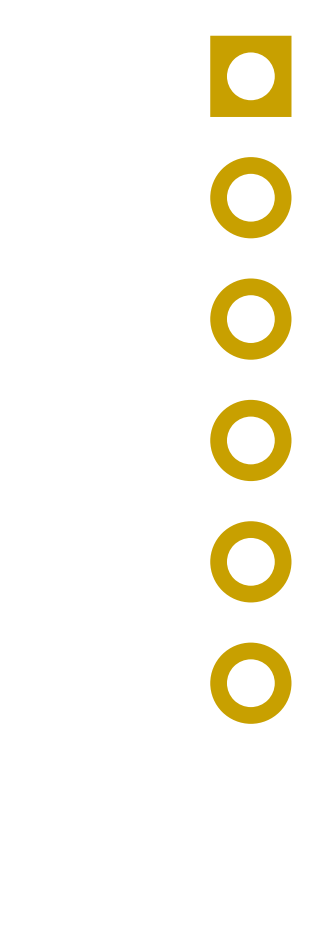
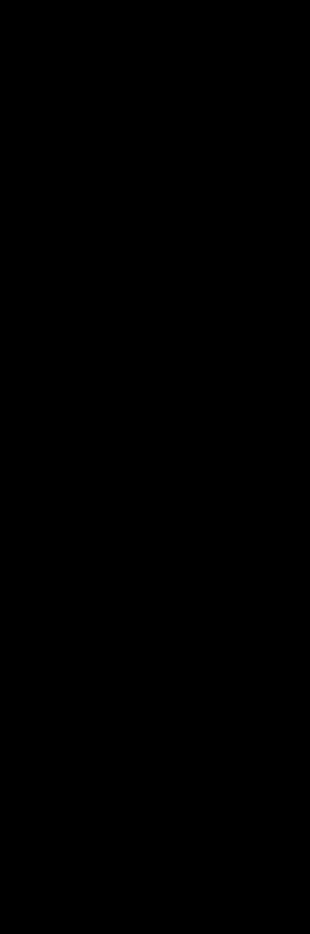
part: (250, 379) -> none

